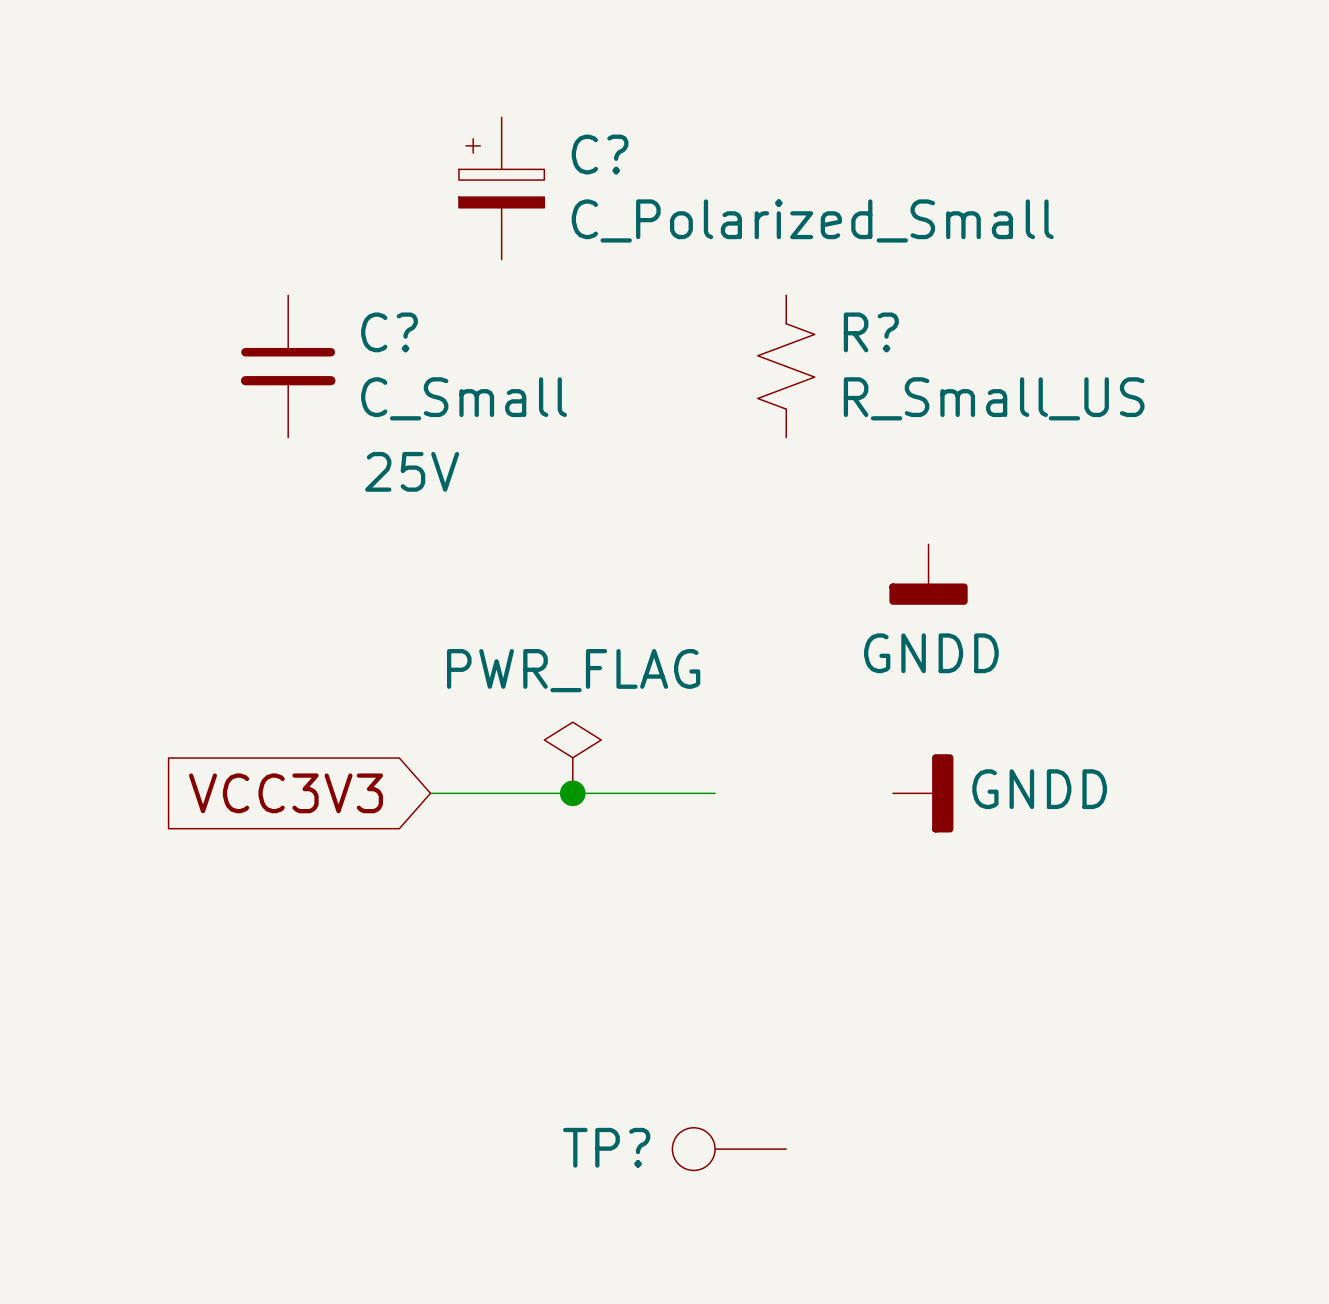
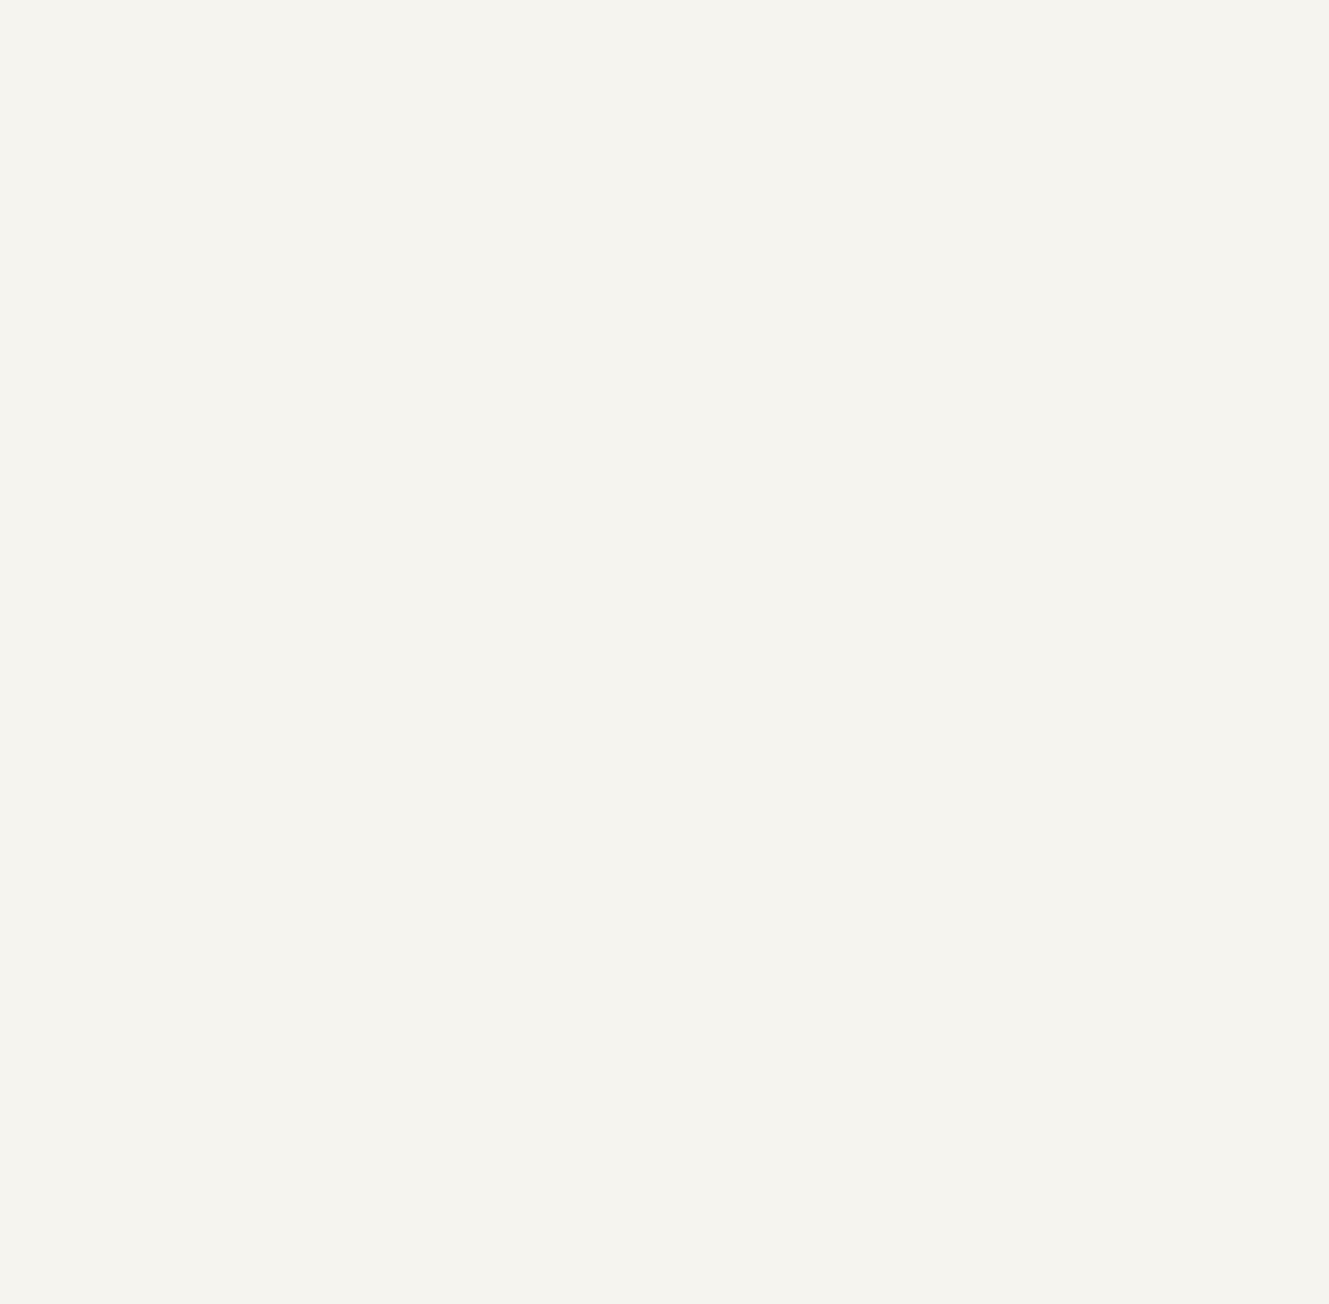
C?: C_Polarized_Small (501, 188) -> none
C?: C_Small (288, 366) -> none
R?: R_Small_US (786, 366) -> none
power symbol: GNDD (928, 574) -> none
power symbol: PWR_FLAG (572, 757) -> none
global label: VCC3V3 (286, 793) -> none
wire: (430, 793) (715, 793) -> none
junction: (572, 793) -> none
power symbol: GNDD (923, 793) -> none
TP?: (729, 1149) -> none

